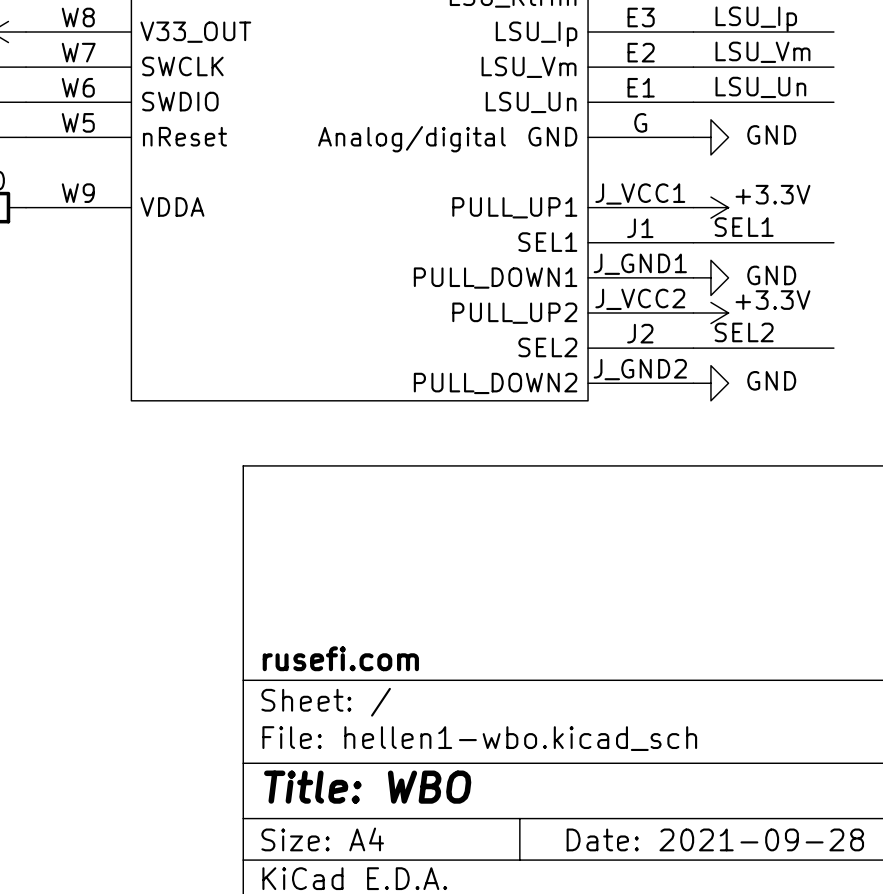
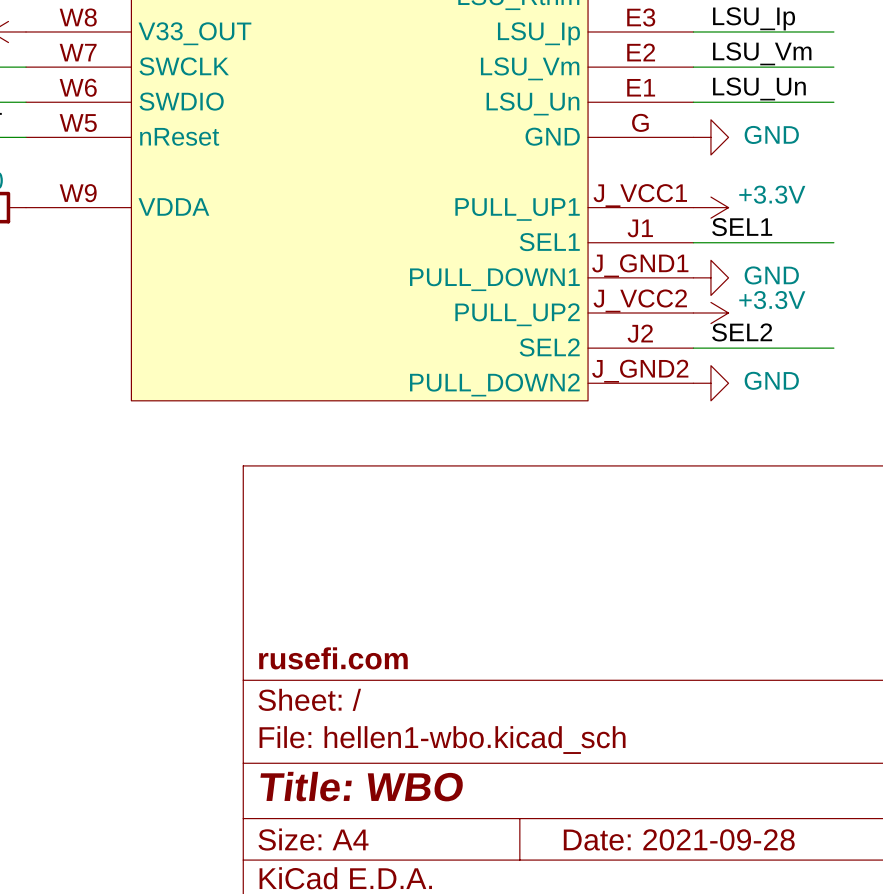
part text: Analog/digital (411, 139) -> none

